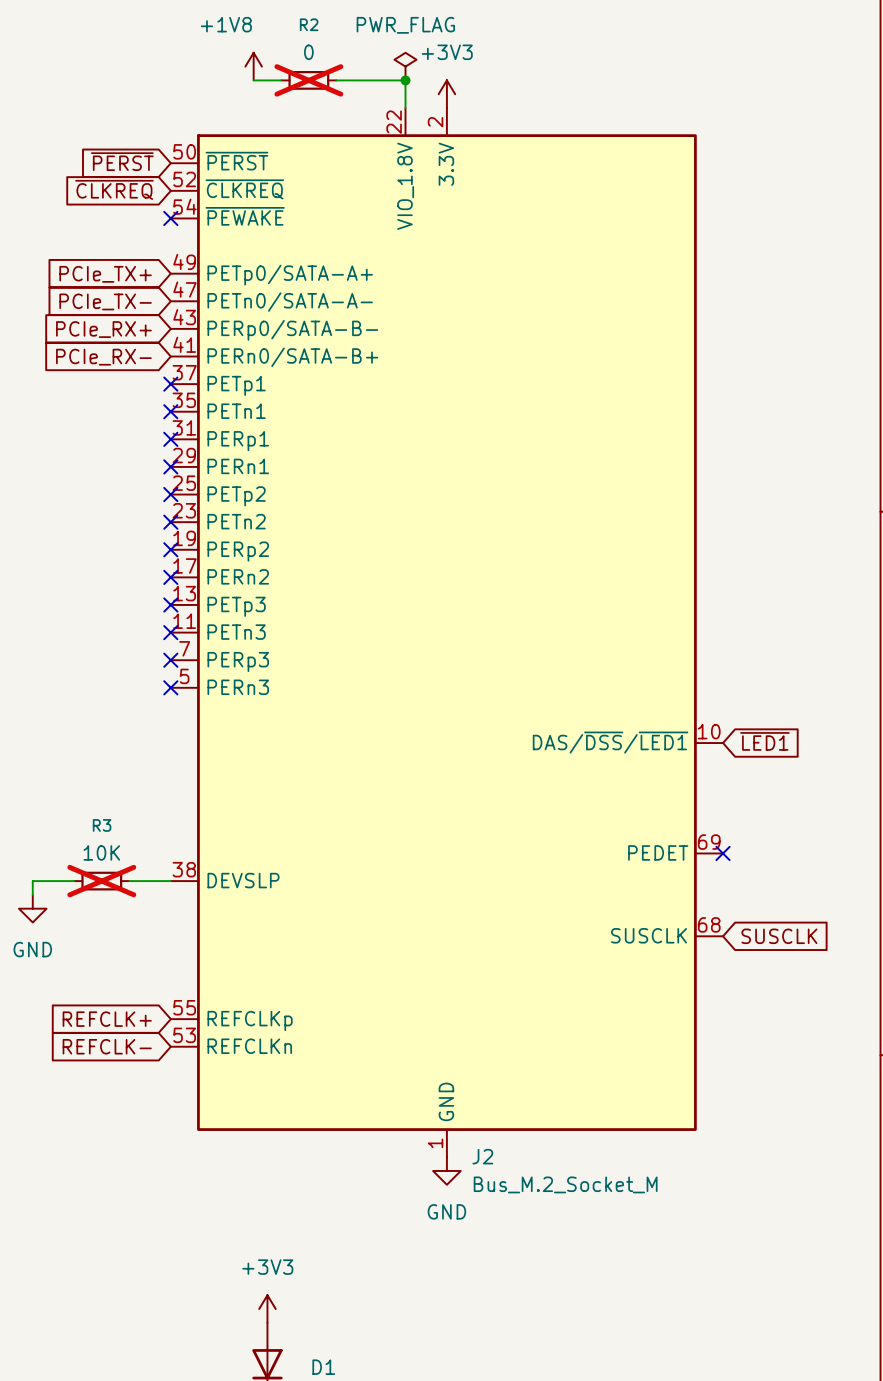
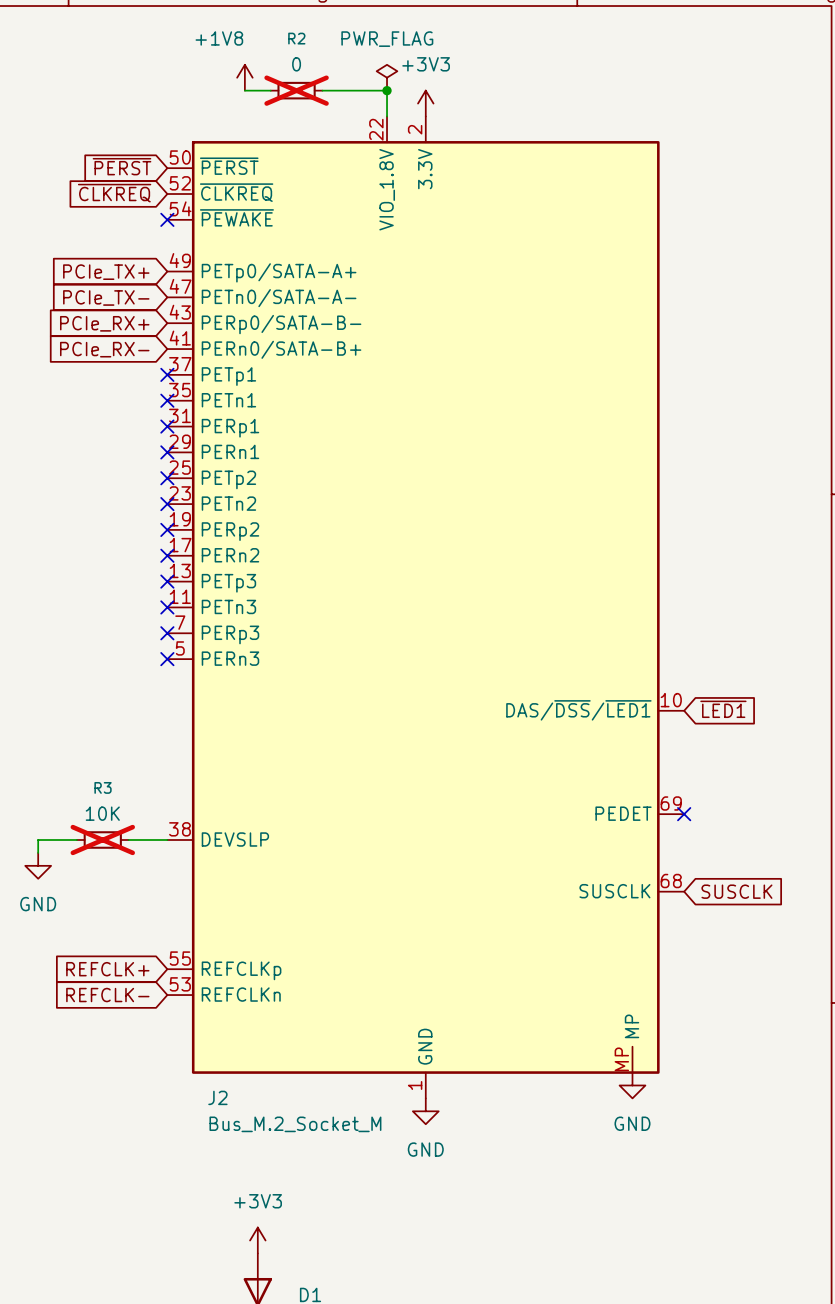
J2 symbol: [170, 108, 724, 1158] -> [167, 116, 685, 1099]
power symbol: none -> GND (632, 1085)
J2 name position: J2 (482, 1156) -> J2 (217, 1097)
J2 value position: Bus_M.2_Socket_M (565, 1184) -> Bus_M.2_Socket_M (295, 1124)

